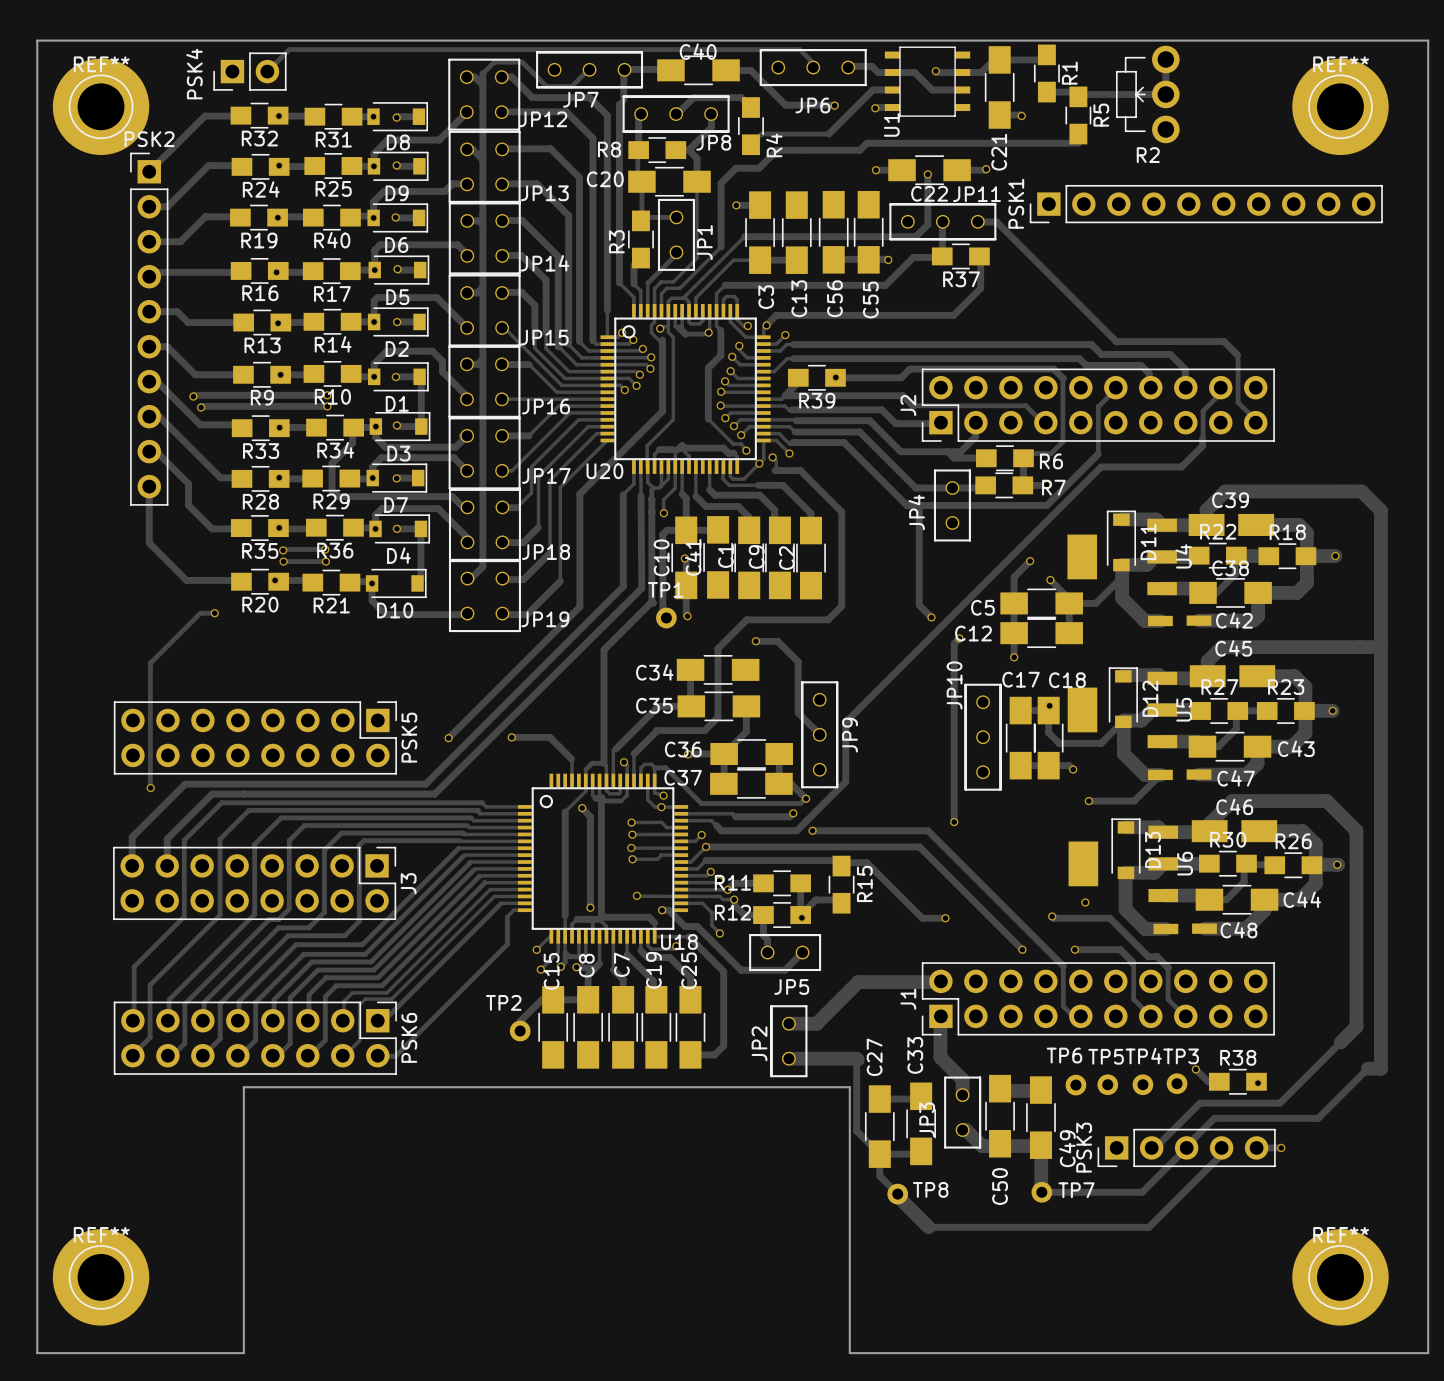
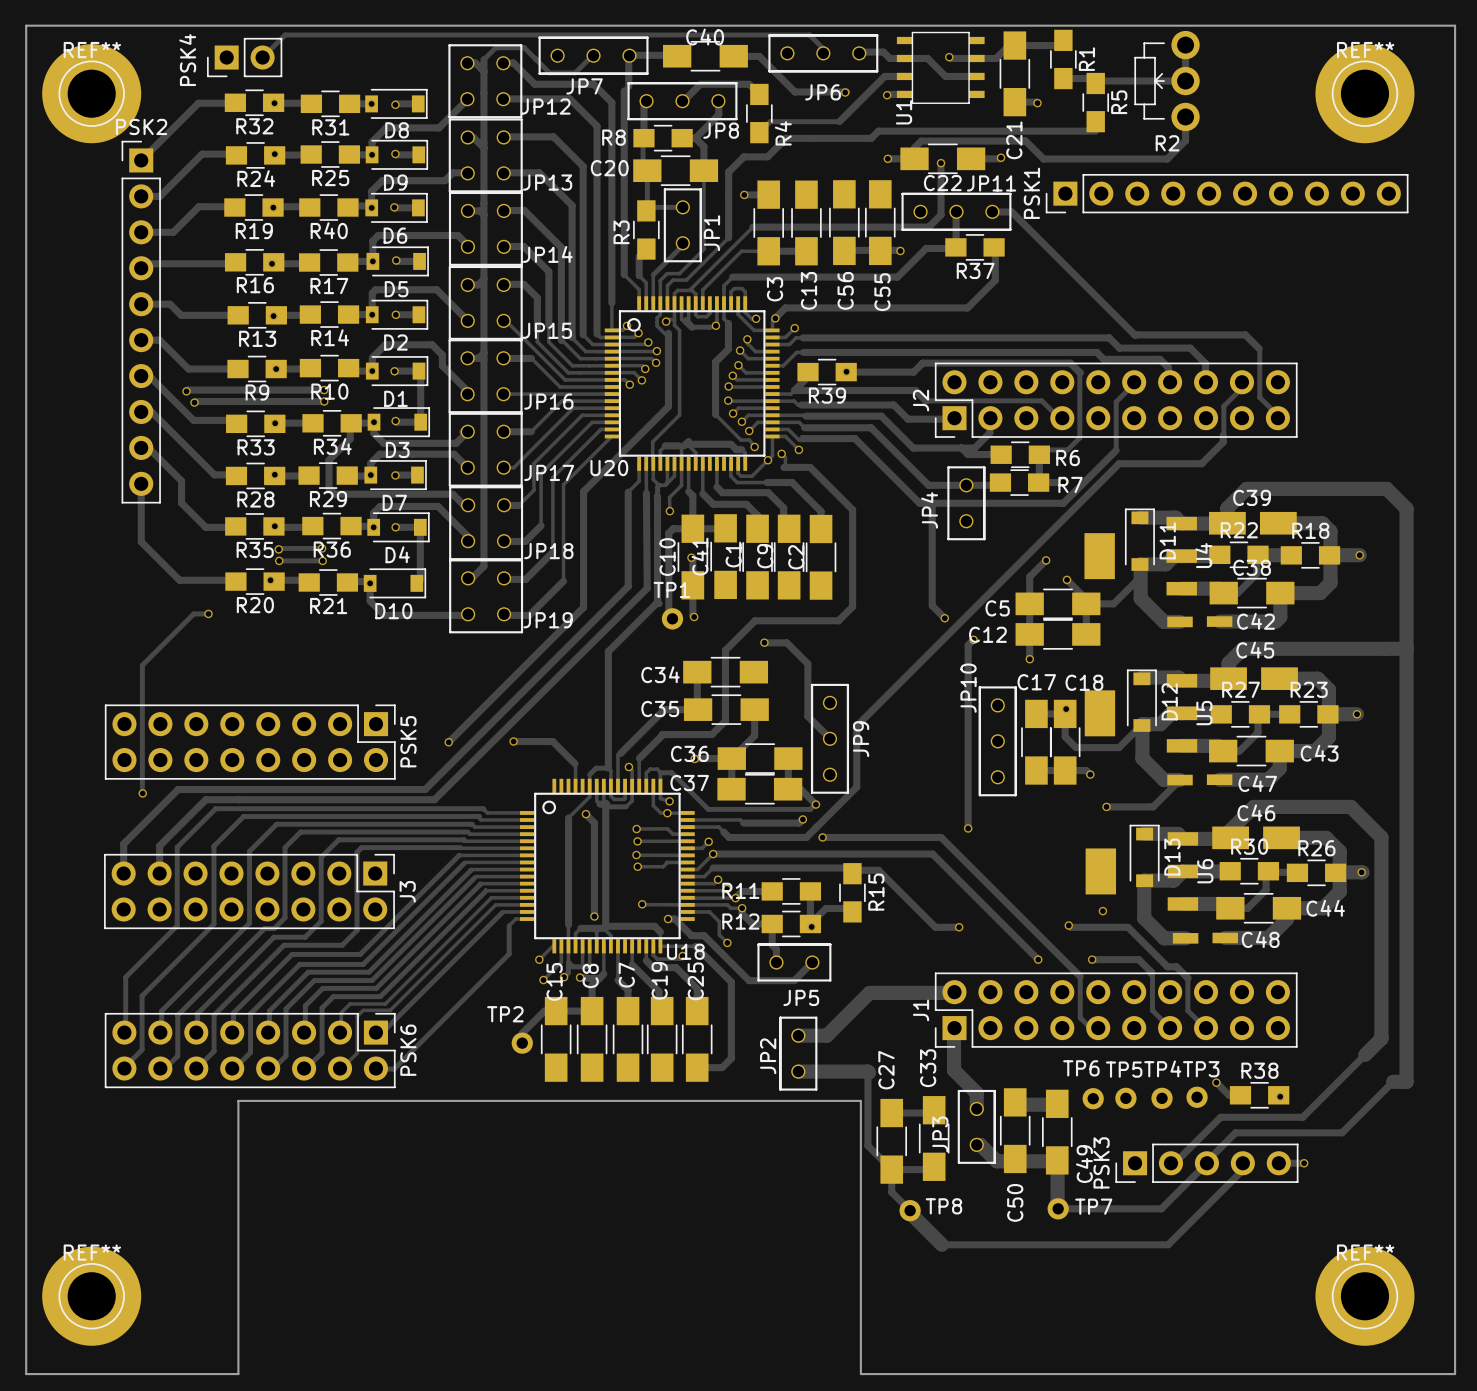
track: none -> (1185, 116) (1185, 140) (1167, 159) (1043, 159) (1025, 141) (921, 141) (914, 147) (914, 158)

